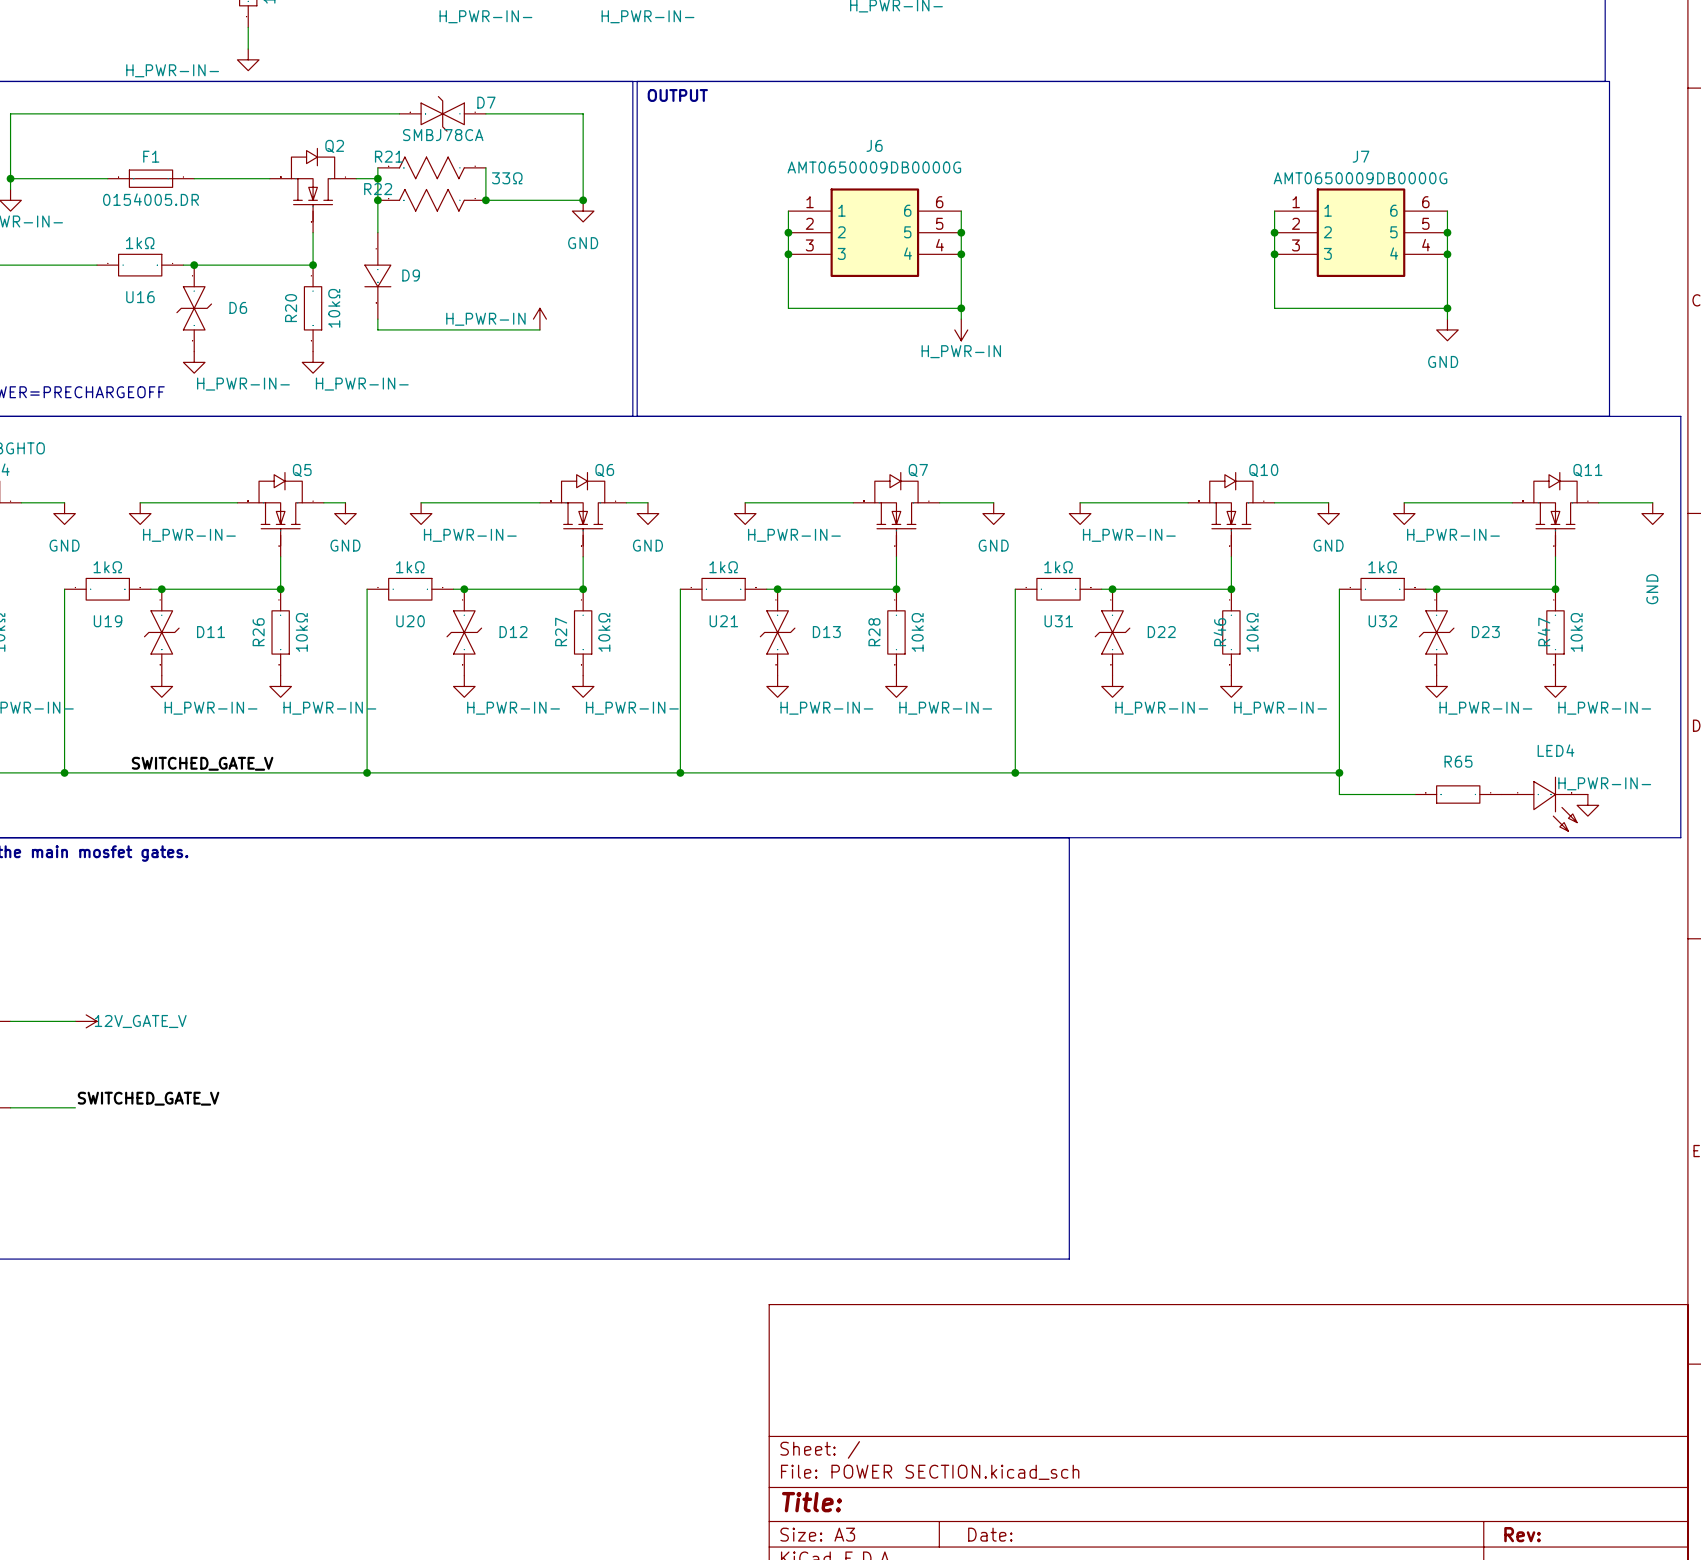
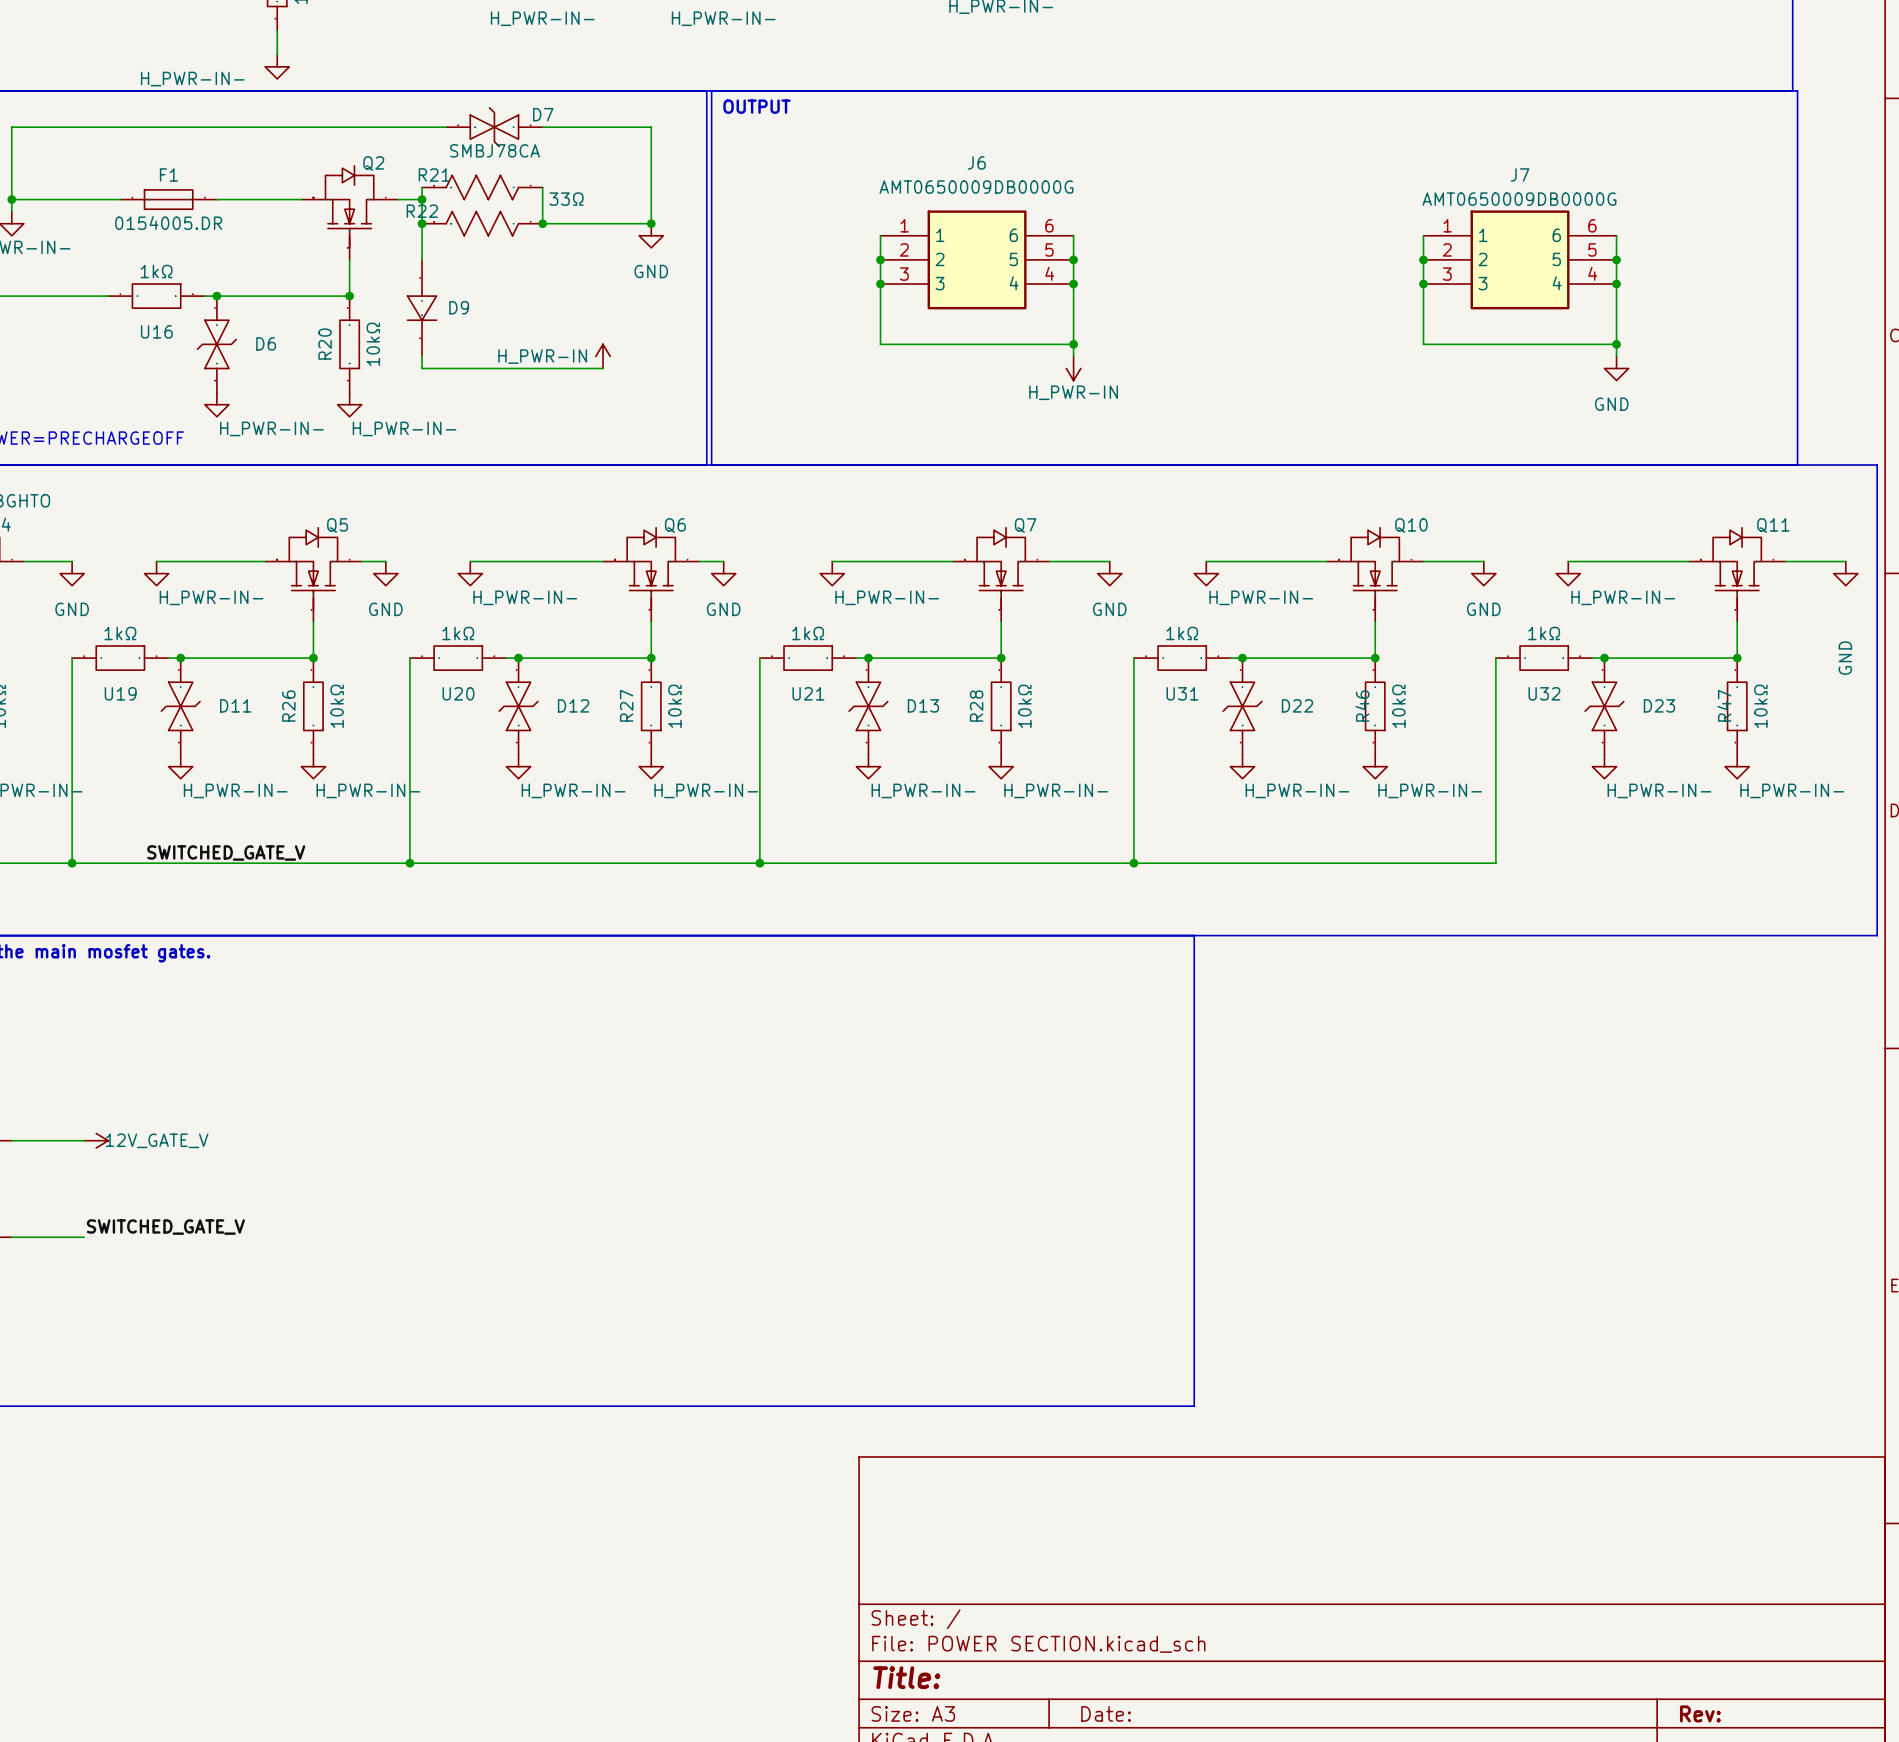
wire: (1339, 772) (1339, 794) (1415, 794) -> none
junction: (1339, 772) -> none
R65: (1458, 794) -> none
LED4: (1544, 804) -> none
power symbol: H_PWR-IN- (1587, 805) -> none

